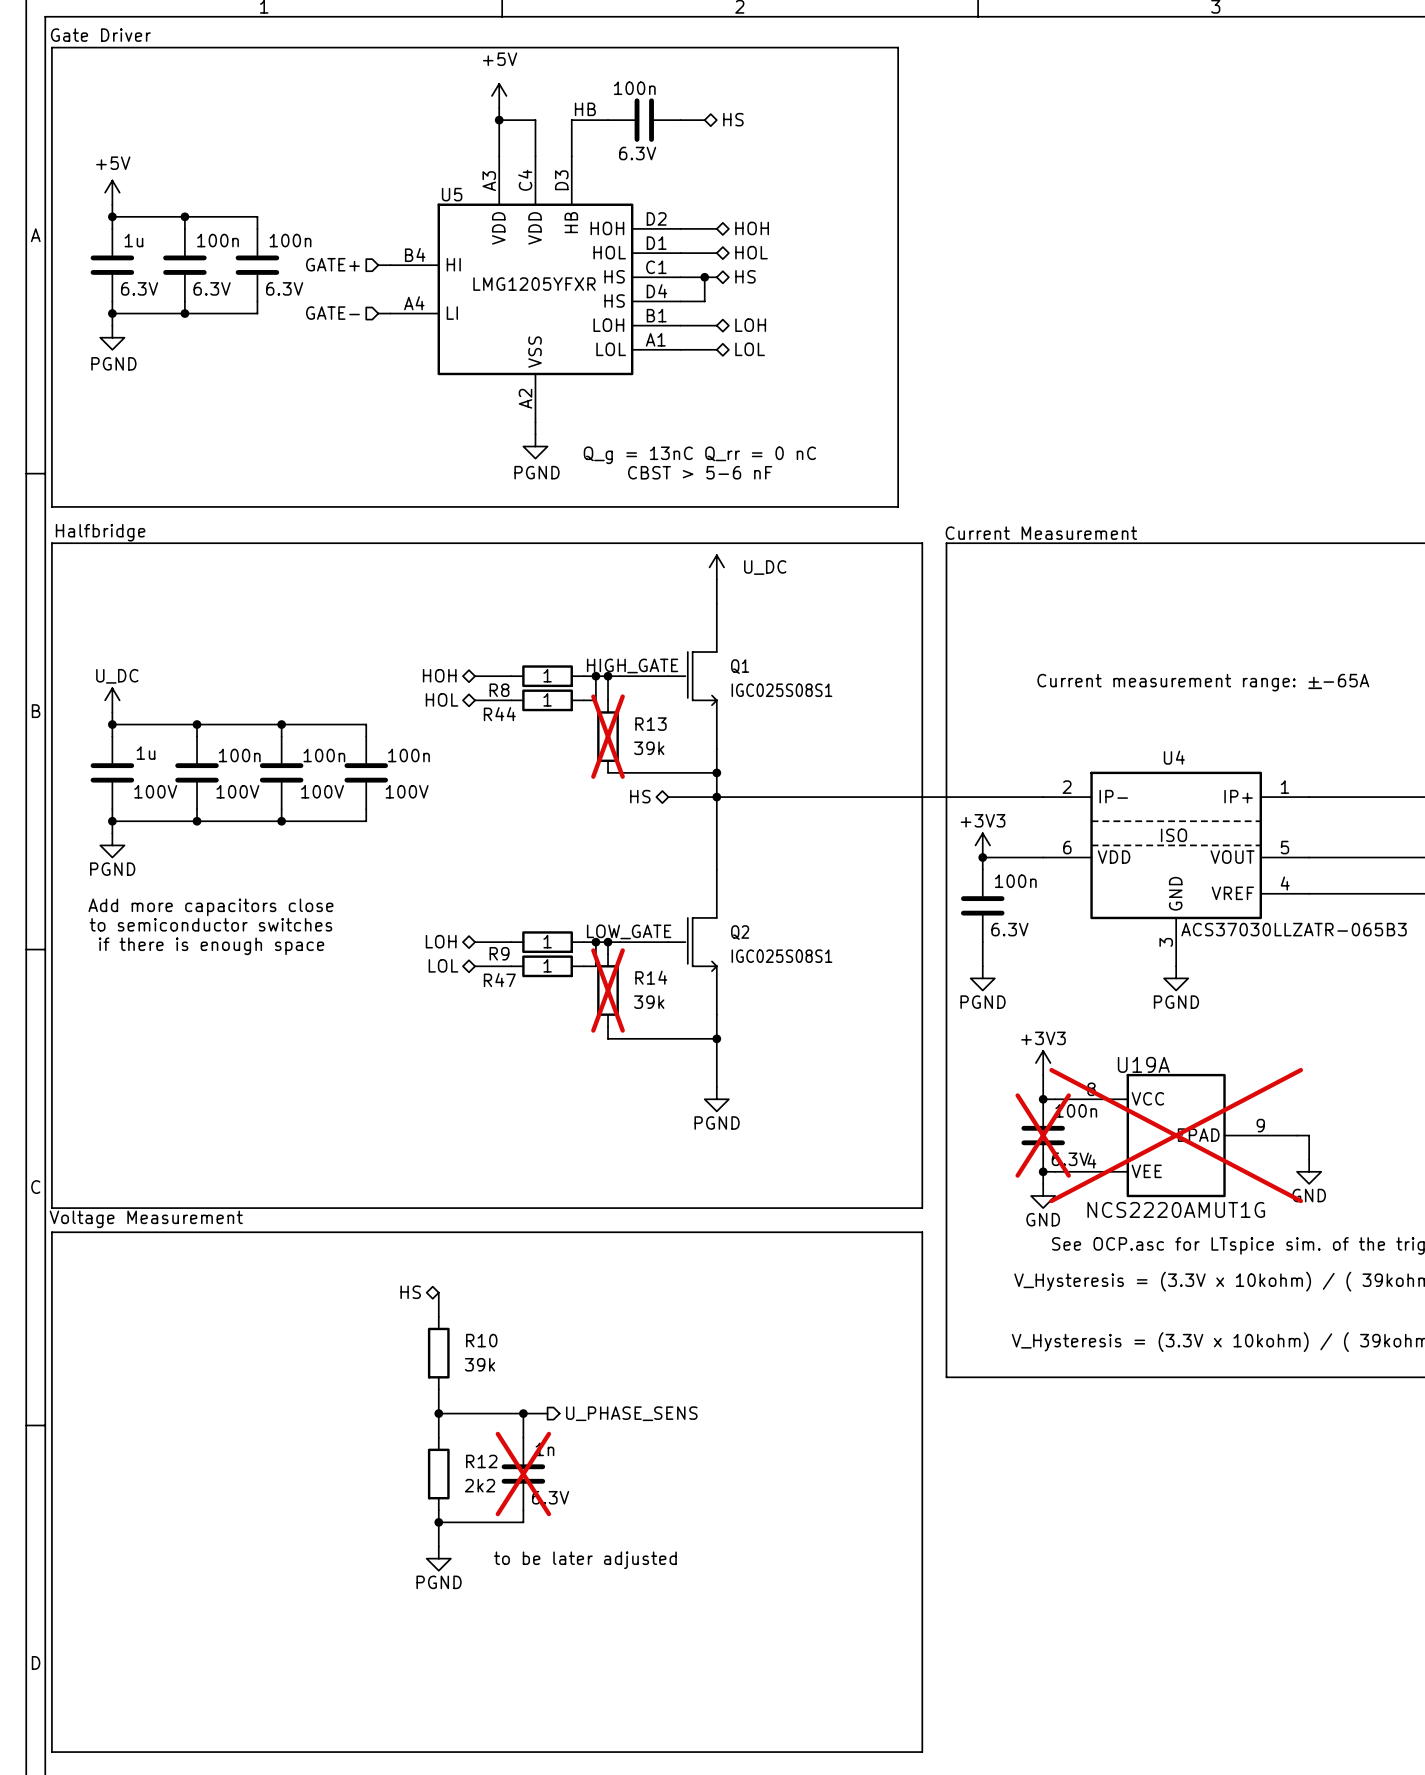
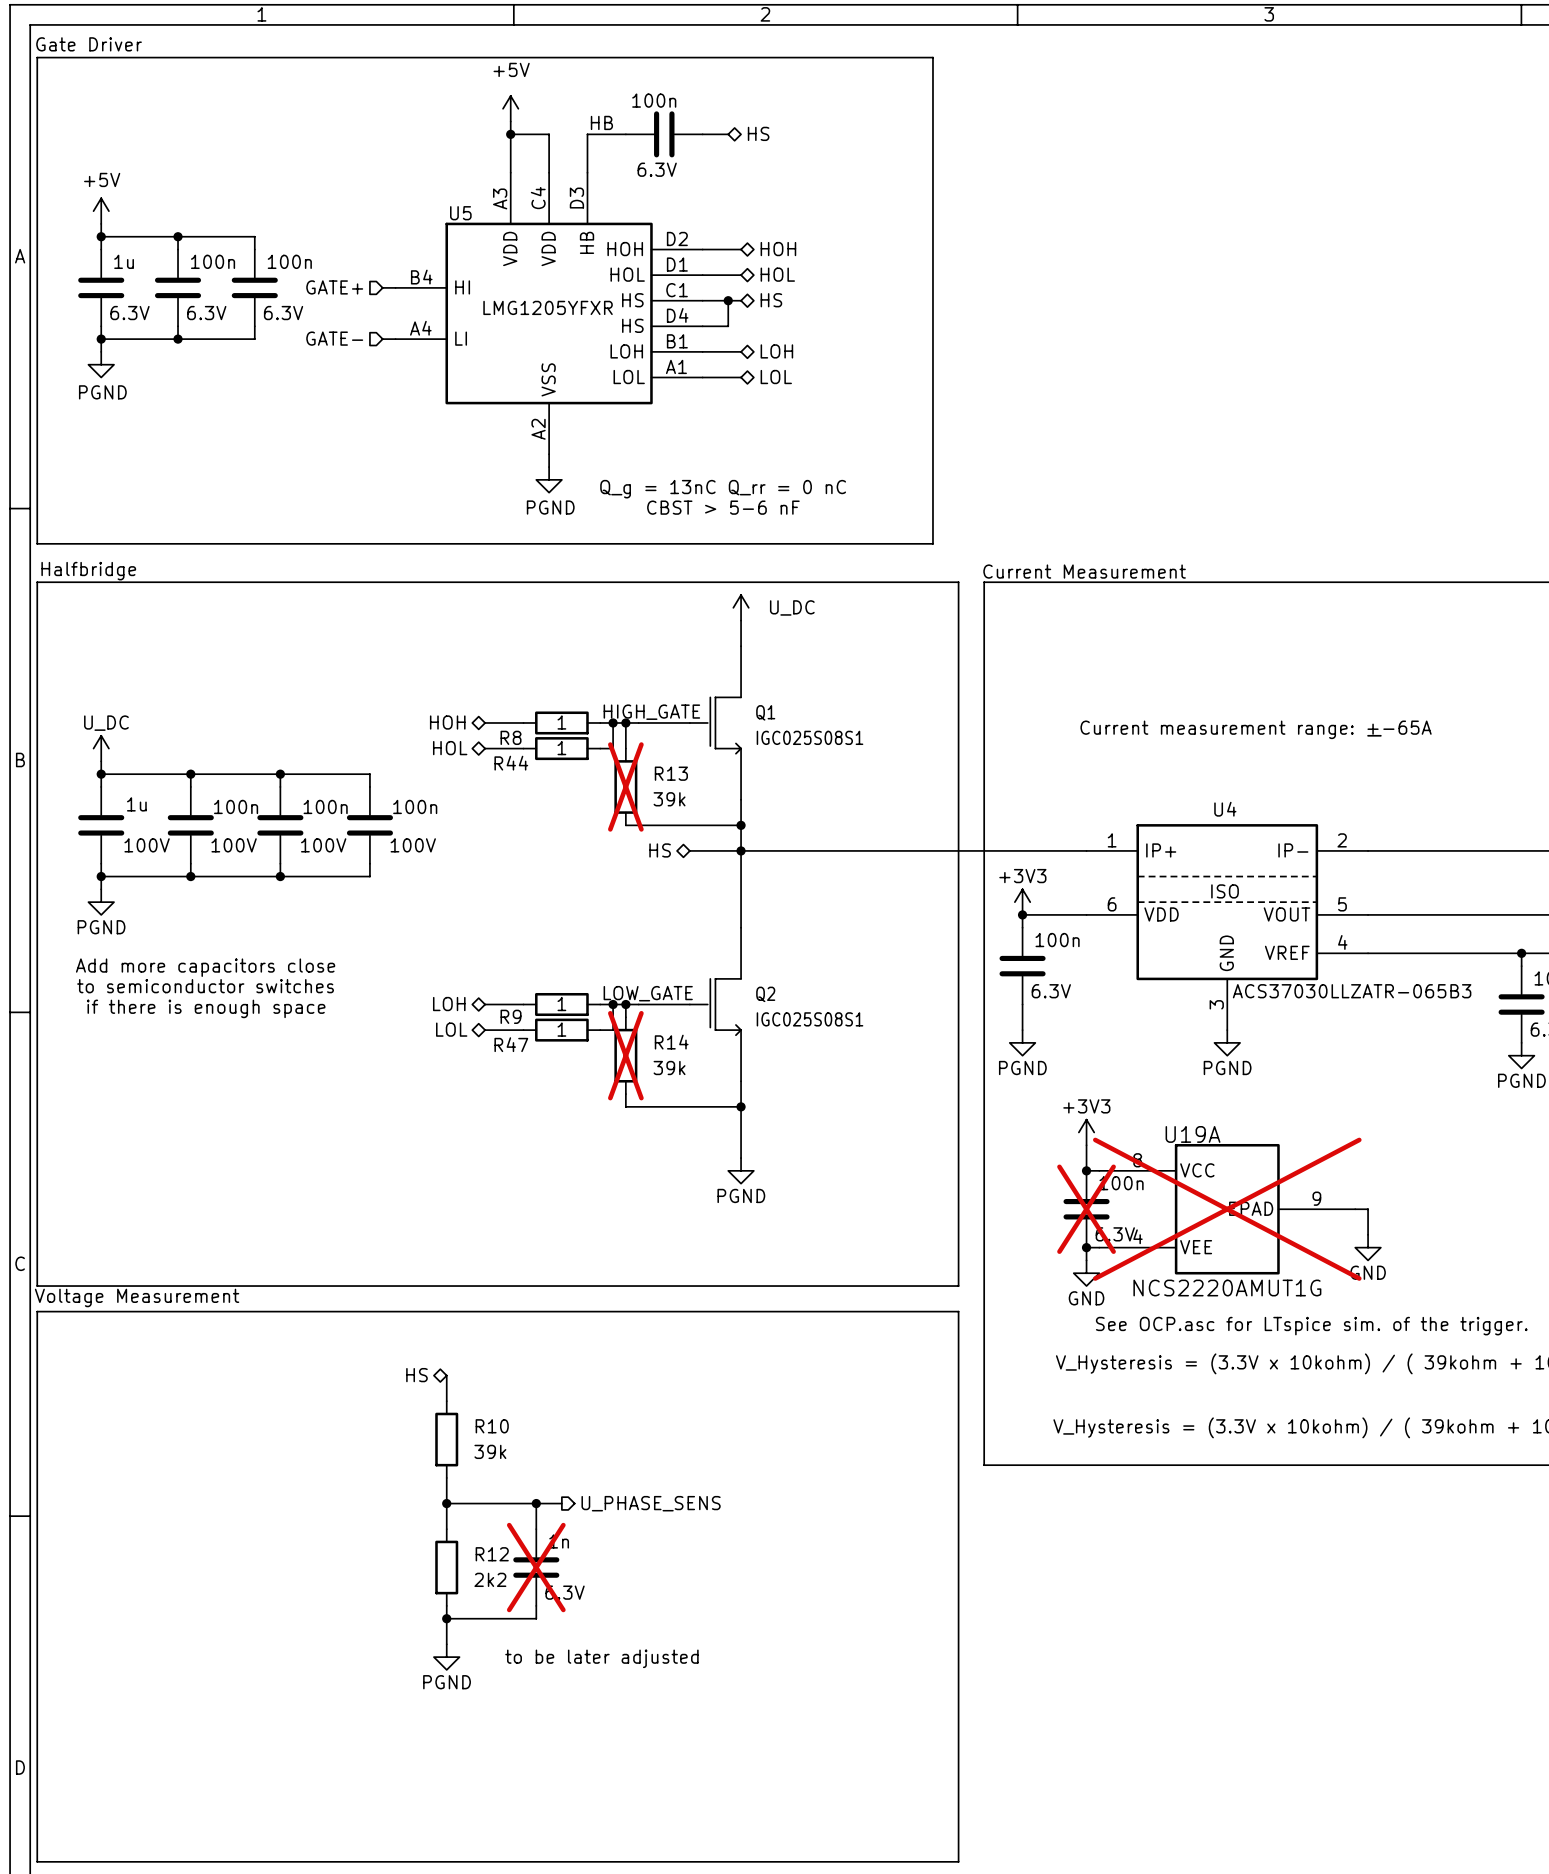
U4 pin number: 2 (1067, 787) -> 1 (1112, 840)
U4 pin number: 1 (1284, 787) -> 2 (1342, 840)
U4 pin name: IP- (1113, 796) -> IP+ (1161, 850)
U4 pin name: IP+ (1238, 796) -> IP- (1293, 850)

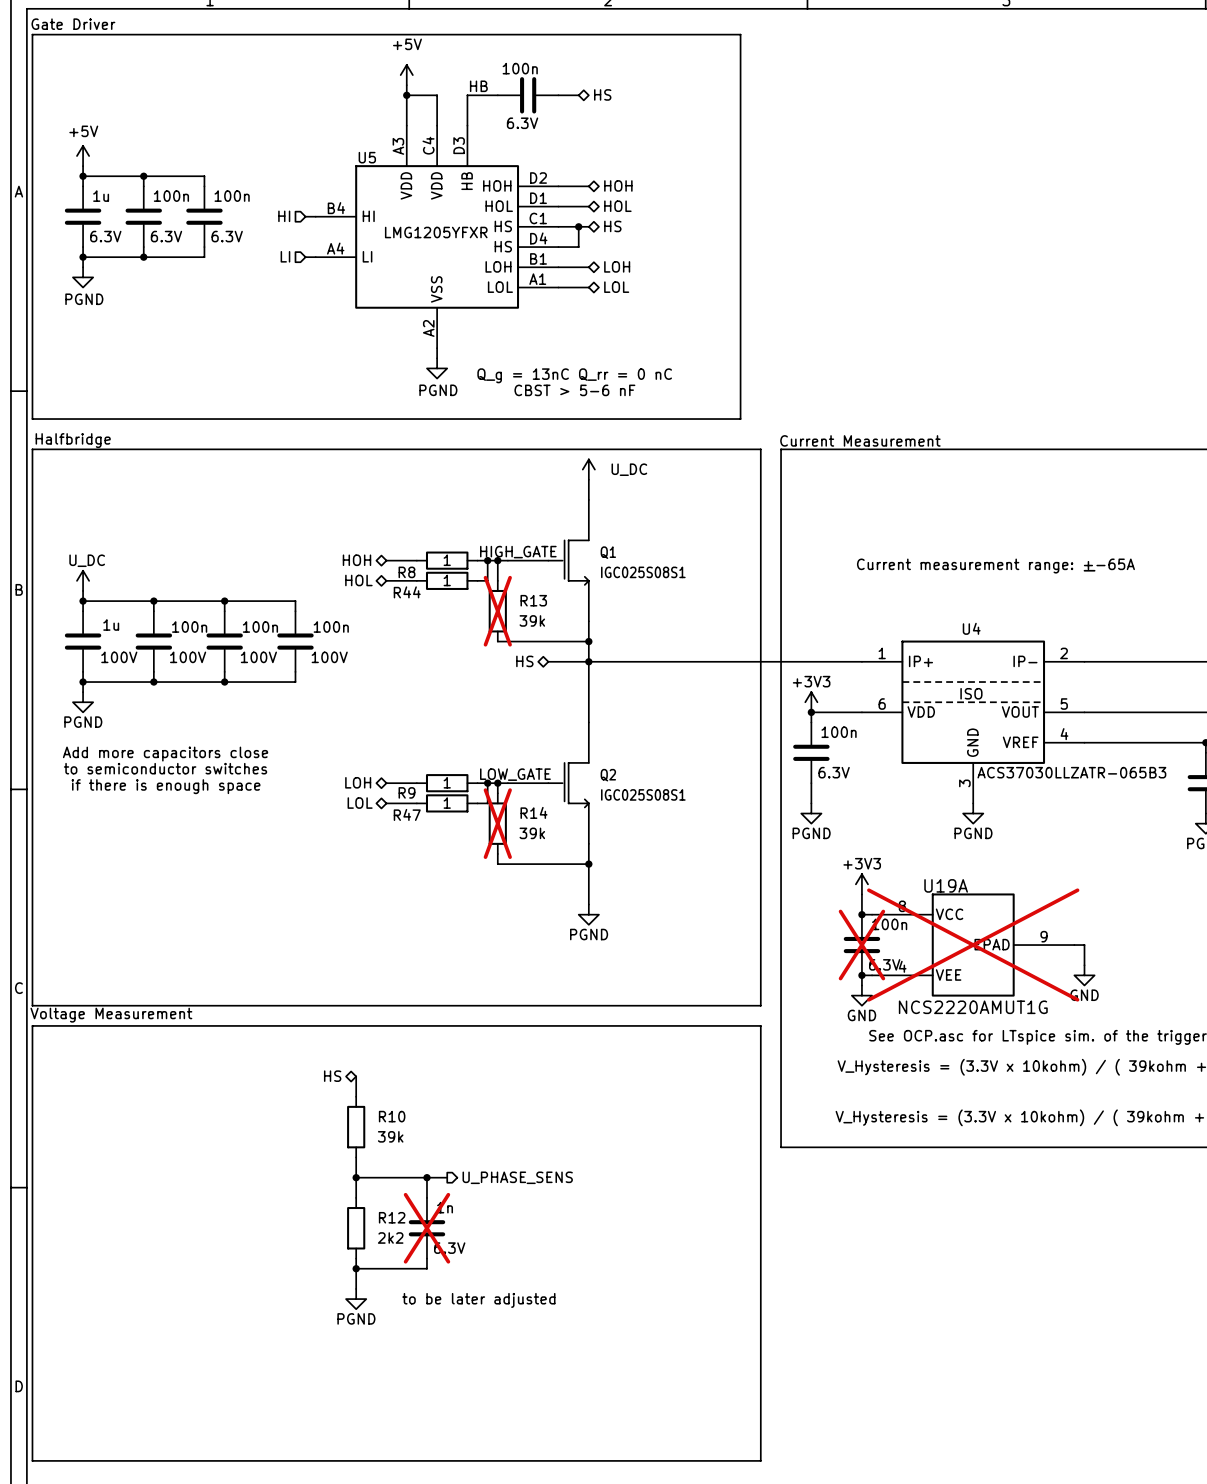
hierarchical label: GATE+ (334, 287) -> HI (284, 216)
hierarchical label: GATE- (334, 338) -> LI (285, 256)

